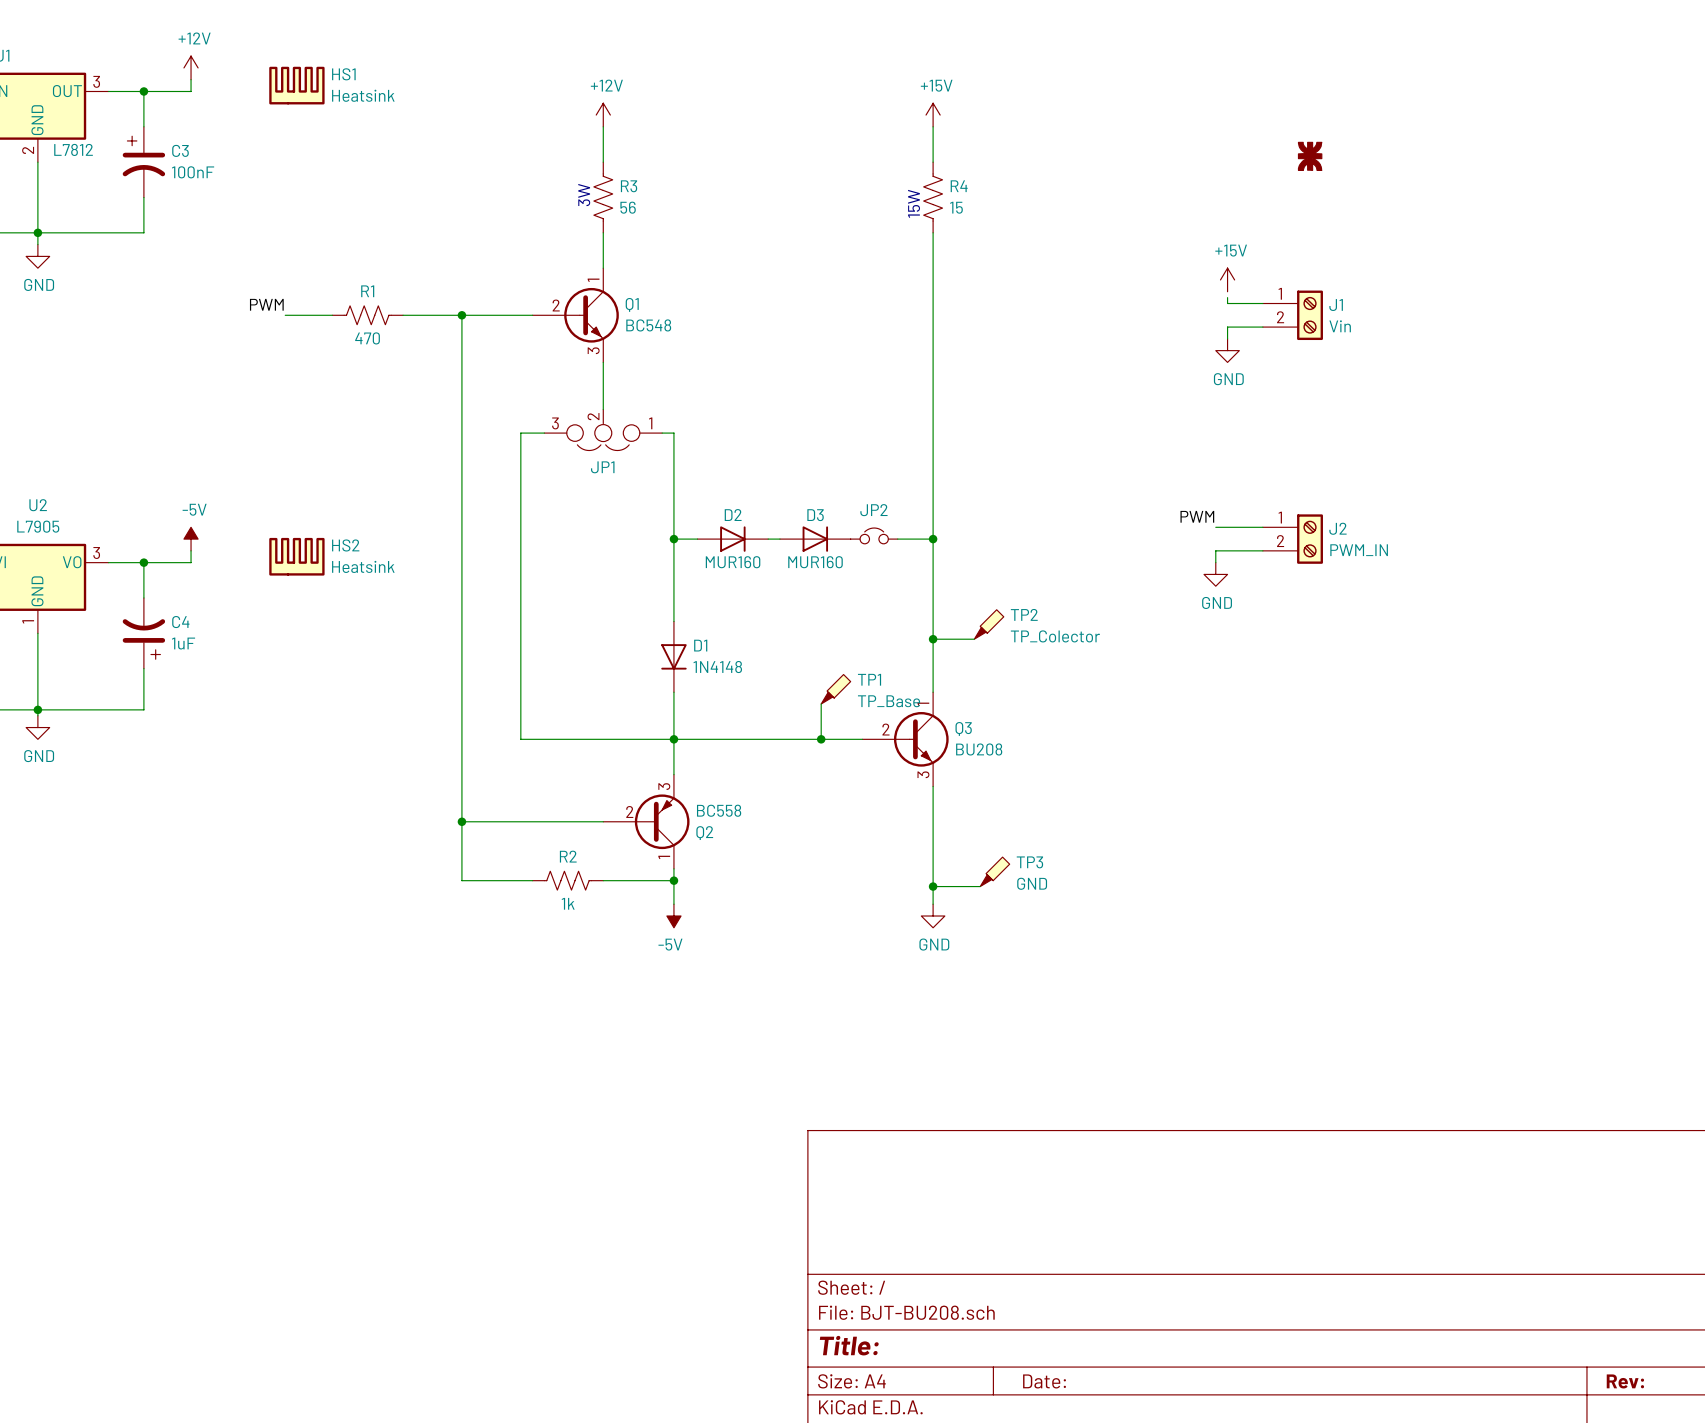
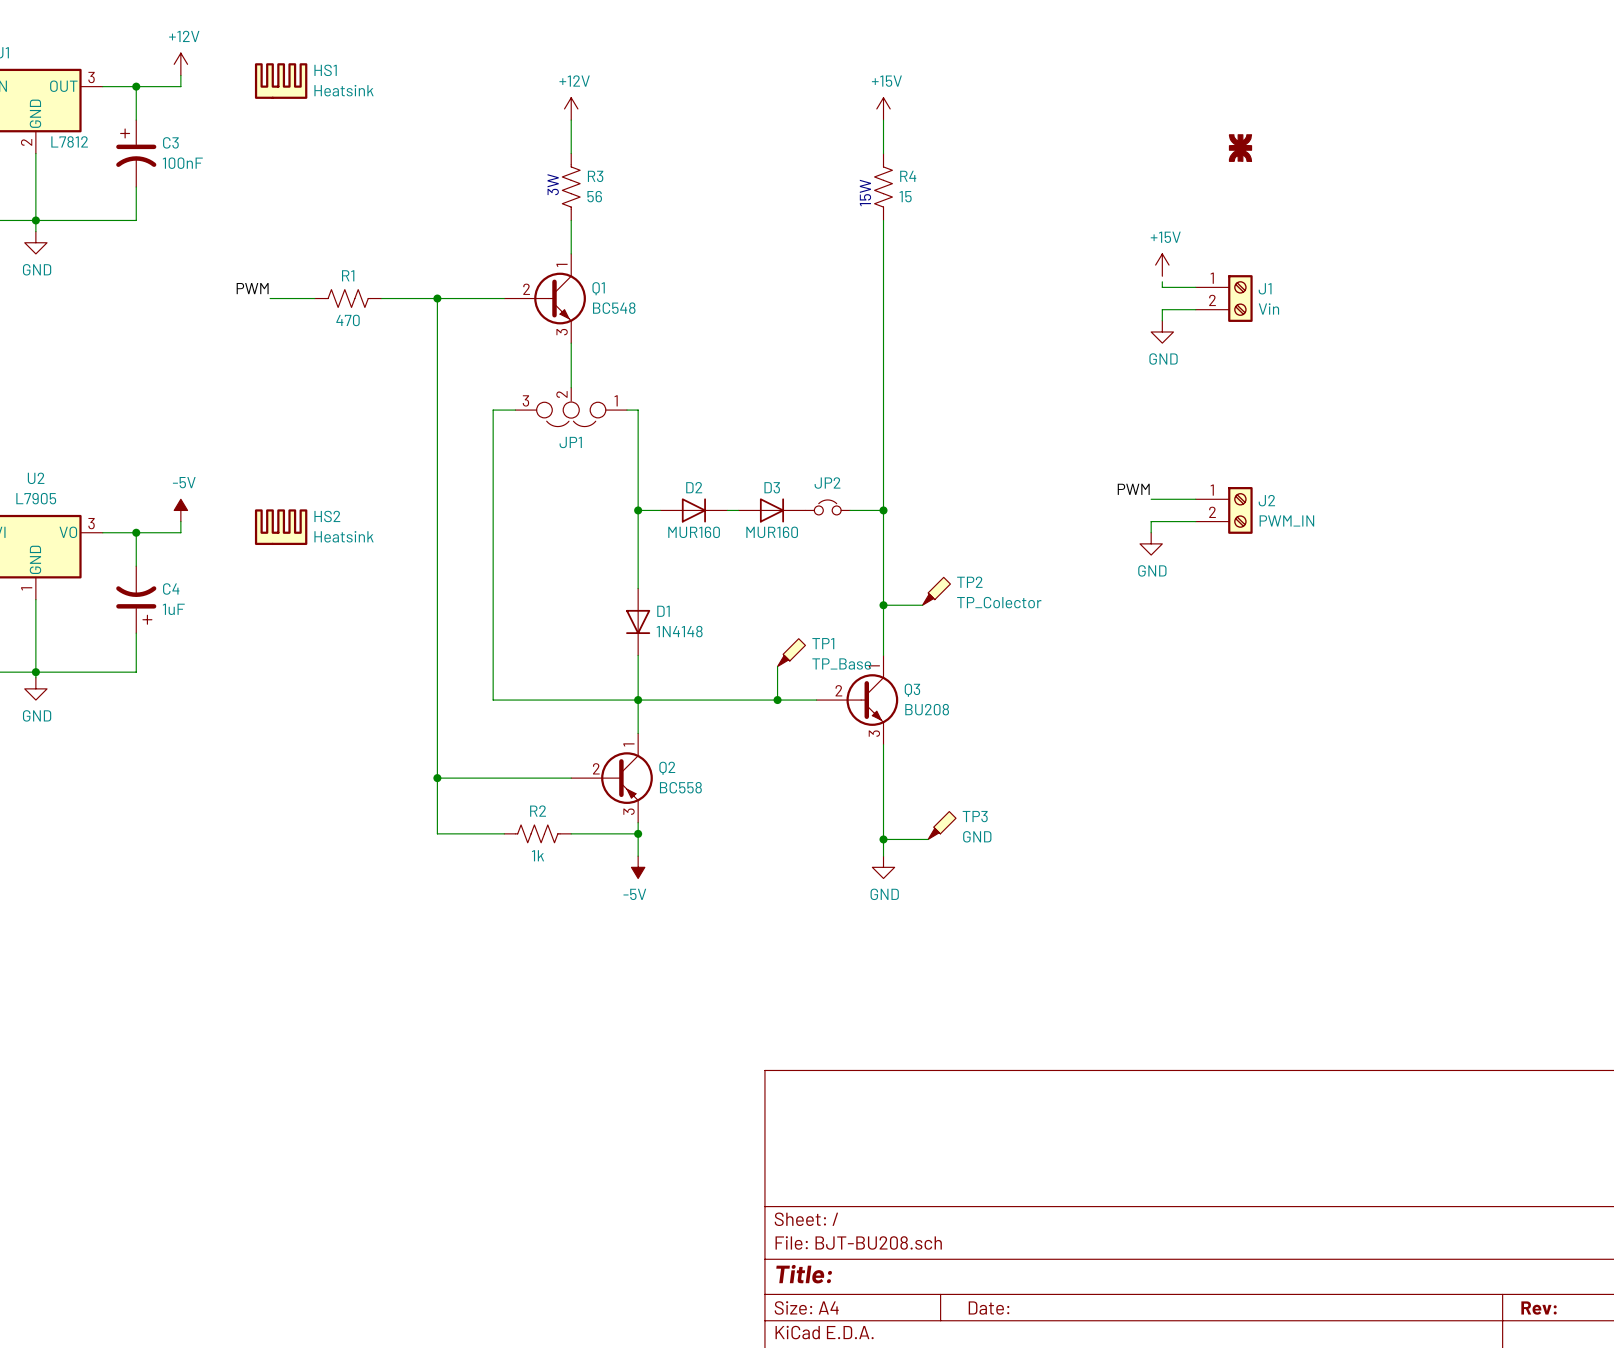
Q2 flip: as is (662, 821) -> up-down (626, 778)

